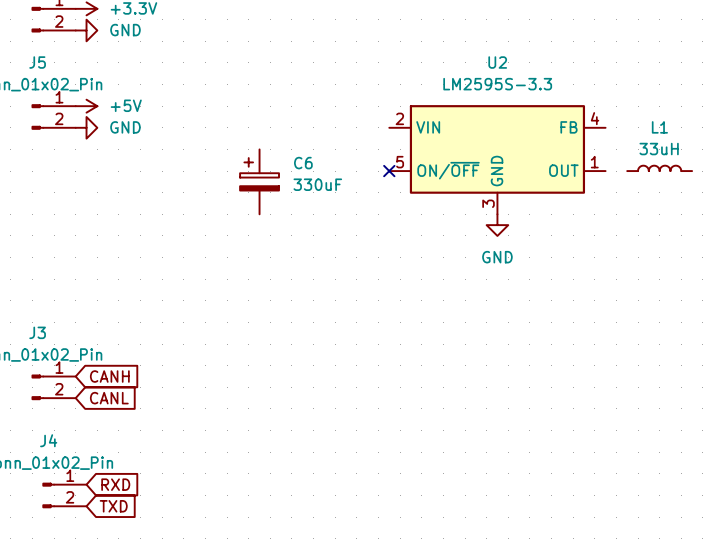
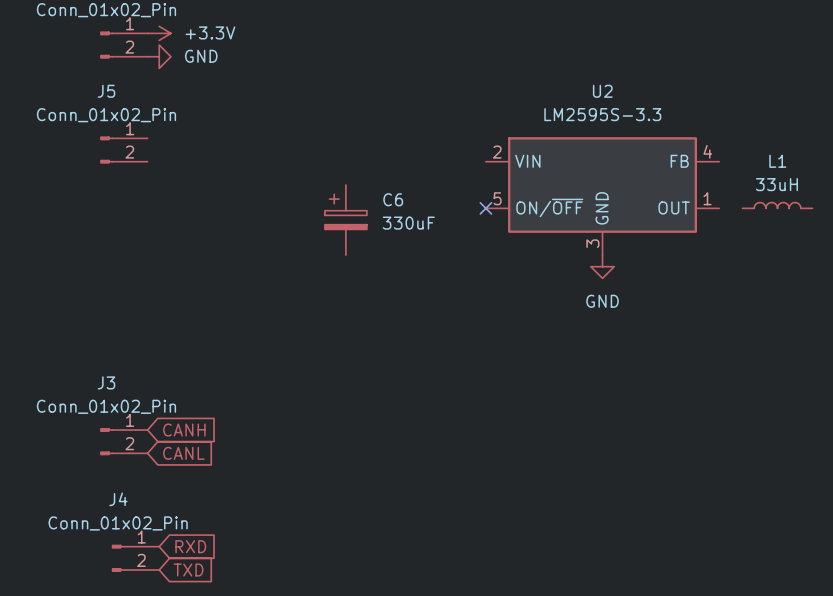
power symbol: +5V (86, 106) -> none
power symbol: GND (86, 127) -> none

